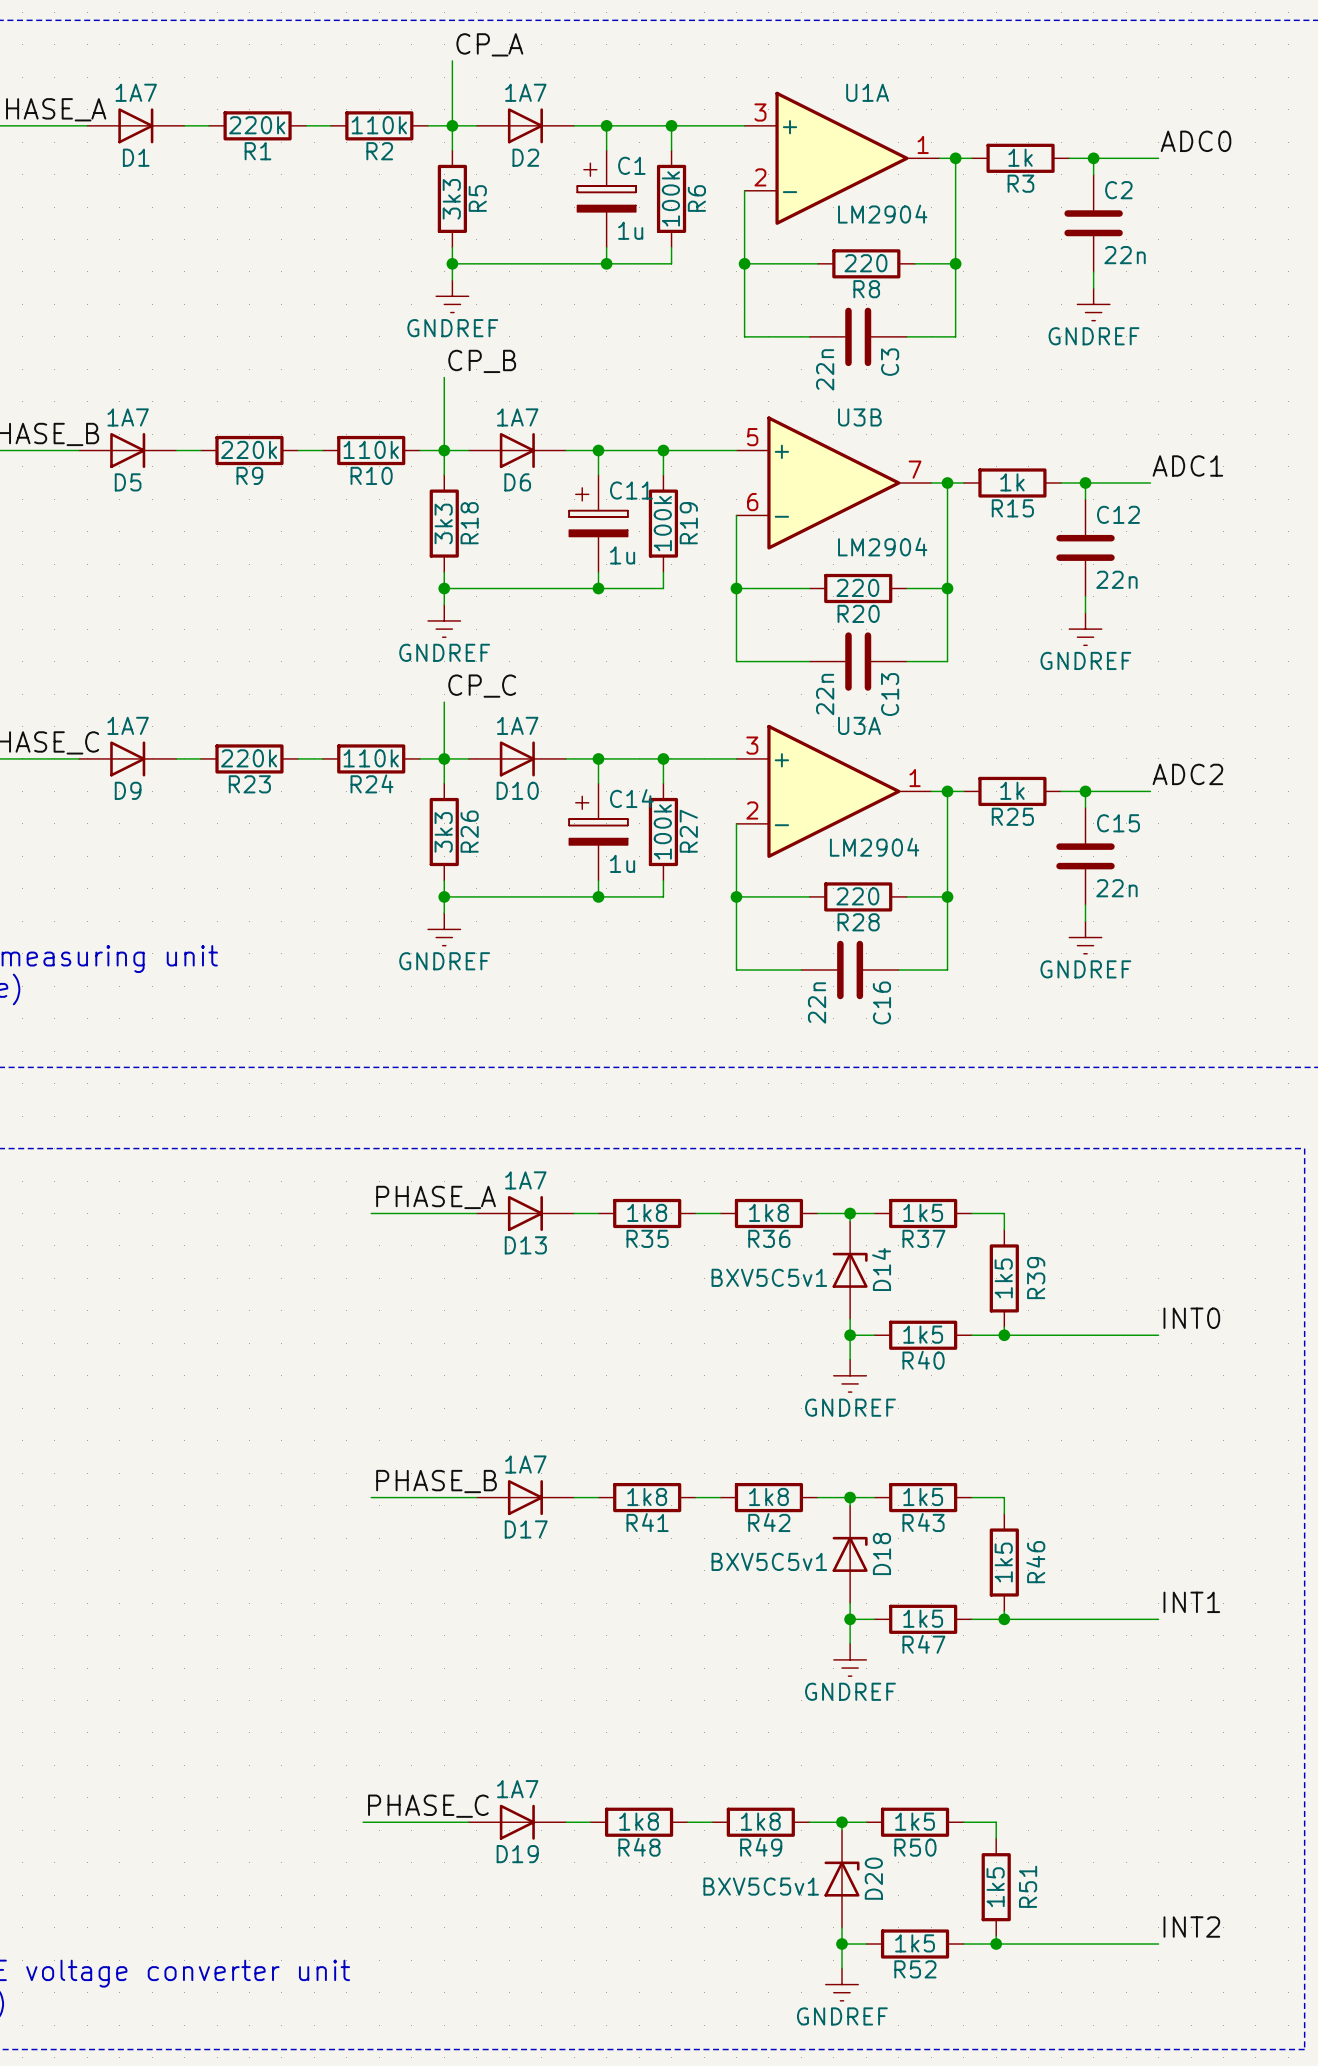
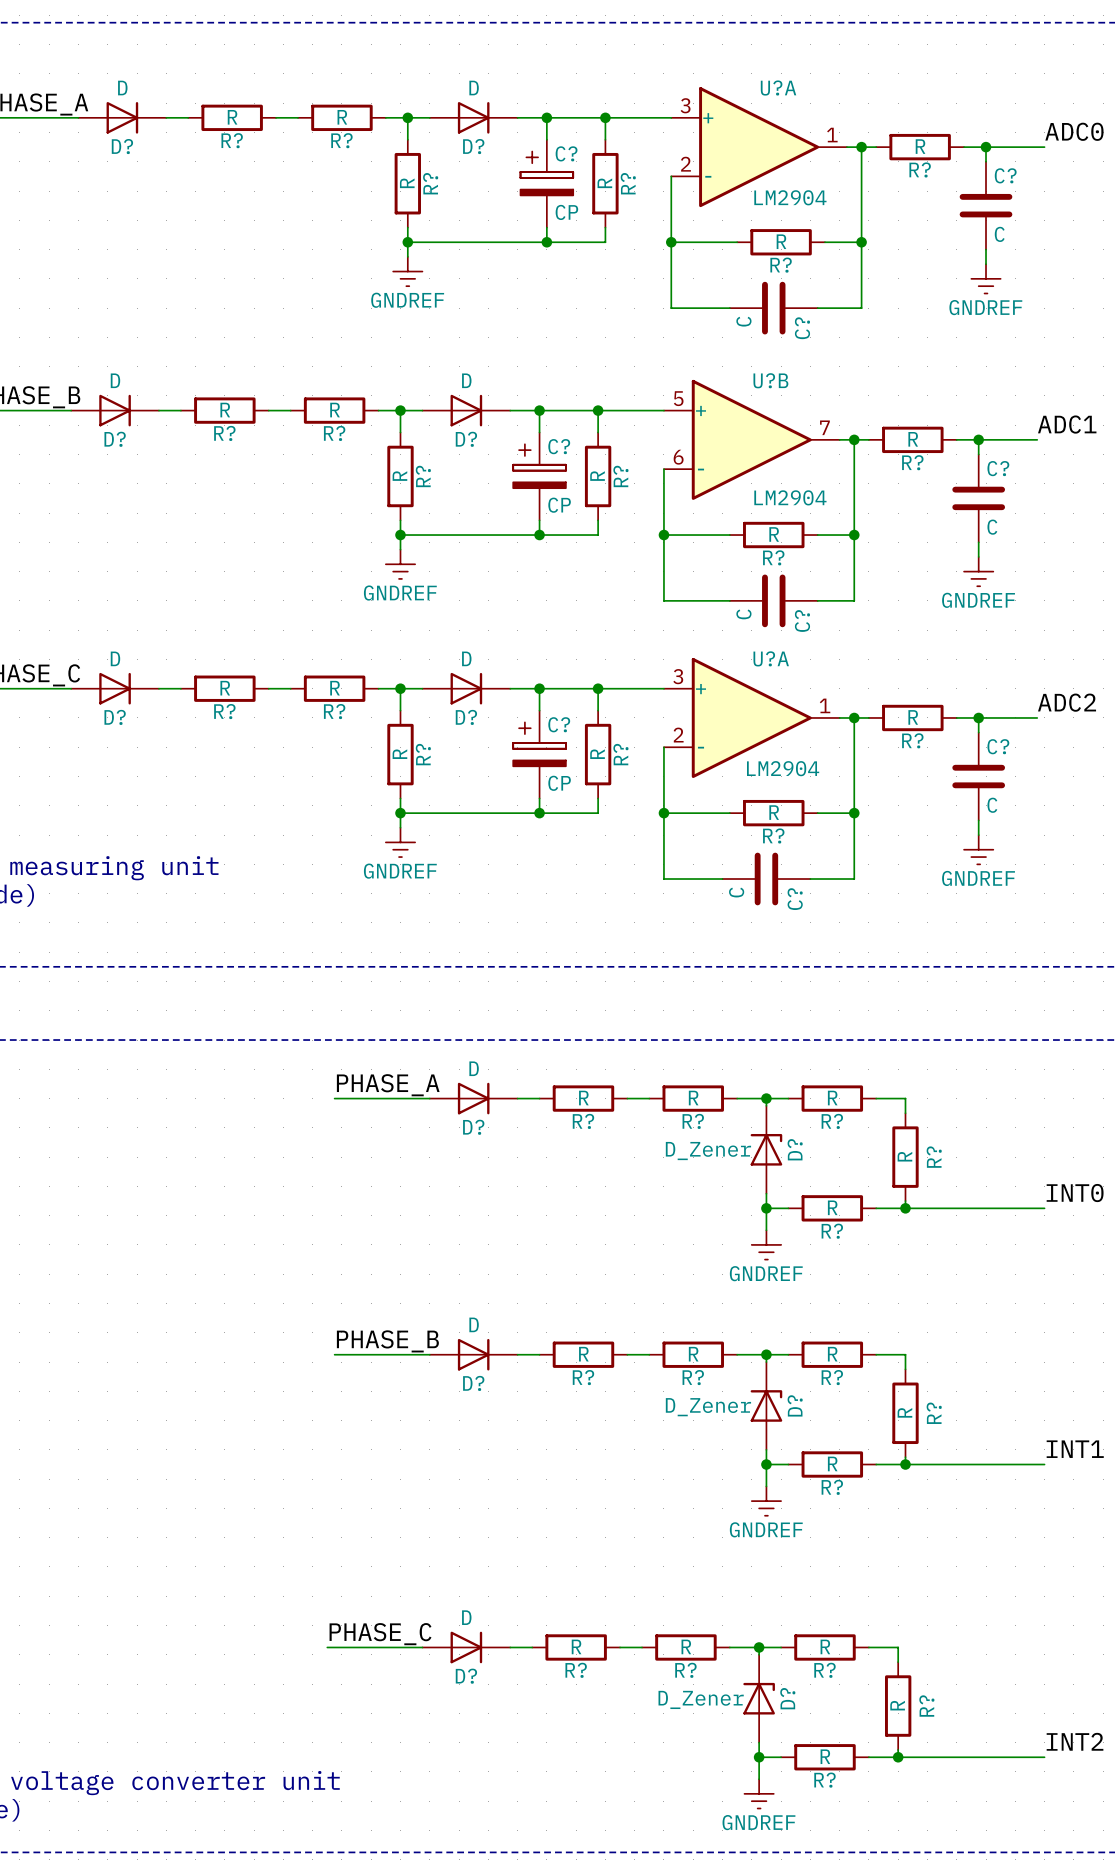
label: CP_A (489, 44) -> none
wire: (452, 60) (452, 125) -> none
D1 value: 1A7 (136, 92) -> D (122, 88)
D2 value: 1A7 (525, 92) -> D (474, 88)
U1A name: U1A (867, 92) -> U?A (778, 88)
R1 value: 220k (257, 125) -> R (232, 117)
R2 value: 110k (379, 125) -> R (342, 117)
R1 name: R1 (257, 151) -> R? (232, 140)
R2 name: R2 (379, 151) -> R? (341, 140)
D1 name: D1 (136, 157) -> D? (122, 146)
D2 name: D2 (525, 157) -> D? (473, 146)
R3 value: 1k (1020, 157) -> R (920, 146)
C1 name: C1 (631, 165) -> C? (566, 153)
R3 name: R3 (1020, 183) -> R? (920, 169)
C2 name: C2 (1118, 190) -> C? (1005, 175)
R5 name: R5 (477, 198) -> R? (430, 183)
R6 value: 100k (670, 198) -> R (604, 183)
R6 name: R6 (696, 198) -> R? (628, 183)
R5 value: 3k3 (451, 199) -> R (407, 183)
C1 value: 1u (630, 230) -> CP (566, 212)
C2 value: 22n (1125, 255) -> C (999, 234)
R8 value: 220 (865, 263) -> R (781, 241)
R8 name: R8 (866, 289) -> R? (781, 265)
label: CP_B (482, 361) -> none
C3 name: C3 (890, 362) -> C? (802, 328)
C3 value: 22n (825, 369) -> C (743, 321)
wire: (444, 377) (444, 450) -> none
D5 value: 1A7 (128, 417) -> D (115, 380)
D6 value: 1A7 (517, 417) -> D (466, 380)
U3B name: U3B (859, 417) -> U?B (770, 380)
R9 value: 220k (249, 449) -> R (225, 410)
R10 value: 110k (371, 449) -> R (335, 410)
R9 name: R9 (249, 475) -> R? (224, 433)
R10 name: R10 (371, 475) -> R? (334, 433)
D5 name: D5 (128, 482) -> D? (115, 439)
D6 name: D6 (517, 482) -> D? (466, 439)
R15 value: 1k (1012, 482) -> R (913, 439)
C11 name: C11 (631, 490) -> C? (559, 446)
R15 name: R15 (1012, 508) -> R? (912, 462)
C12 name: C12 (1118, 514) -> C? (998, 468)
R18 value: 3k3 (443, 523) -> R (399, 476)
R18 name: R18 (469, 523) -> R? (423, 476)
R19 value: 100k (662, 523) -> R (597, 476)
R19 name: R19 (688, 523) -> R? (620, 476)
C11 value: 1u (622, 555) -> CP (559, 505)
C12 value: 22n (1116, 579) -> C (992, 527)
R20 value: 220 (857, 587) -> R (774, 534)
R20 name: R20 (858, 613) -> R? (773, 557)
label: CP_C (482, 686) -> none
C13 value: 22n (825, 694) -> C (743, 614)
C13 name: C13 (890, 694) -> C? (802, 620)
wire: (444, 702) (444, 758) -> none
D9 value: 1A7 (128, 725) -> D (115, 658)
D10 value: 1A7 (517, 725) -> D (466, 658)
U3A name: U3A (859, 725) -> U?A (771, 658)
R23 value: 220k (249, 758) -> R (225, 688)
R24 value: 110k (371, 758) -> R (335, 688)
R24 name: R24 (371, 783) -> R? (334, 711)
R23 name: R23 (249, 784) -> R? (224, 711)
D9 name: D9 (128, 790) -> D? (115, 717)
D10 name: D10 (517, 790) -> D? (466, 717)
R25 value: 1k (1012, 790) -> R (913, 717)
C14 name: C14 (631, 798) -> C? (559, 724)
R25 name: R25 (1012, 816) -> R? (912, 740)
C15 name: C15 (1118, 823) -> C? (998, 746)
R26 name: R26 (469, 831) -> R? (423, 754)
R27 name: R27 (688, 831) -> R? (620, 754)
R26 value: 3k3 (443, 832) -> R (399, 754)
R27 value: 100k (662, 832) -> R (597, 754)
C14 value: 1u (622, 863) -> CP (559, 783)
C15 value: 22n (1116, 888) -> C (992, 805)
R28 value: 220 (857, 896) -> R (774, 812)
R28 name: R28 (858, 922) -> R? (773, 835)
C16 value: 22n (817, 1002) -> C (736, 892)
C16 name: C16 (881, 1002) -> C? (795, 899)
D13 value: 1A7 (525, 1180) -> D (474, 1068)
R35 value: 1k8 (647, 1212) -> R (583, 1098)
R36 value: 1k8 (768, 1212) -> R (693, 1098)
R37 value: 1k5 (923, 1212) -> R (832, 1098)
R35 name: R35 (647, 1238) -> R? (583, 1121)
R36 name: R36 (769, 1238) -> R? (693, 1121)
R37 name: R37 (923, 1238) -> R? (832, 1121)
D13 name: D13 (525, 1245) -> D? (473, 1127)
D14 name: D14 (881, 1269) -> D? (795, 1149)
D14 value: BXV5C5v1 (769, 1277) -> D_Zener (708, 1151)
R39 value: 1k5 (1003, 1278) -> R (904, 1156)
R39 name: R39 (1036, 1278) -> R? (934, 1157)
R40 value: 1k5 (923, 1334) -> R (832, 1207)
R40 name: R40 (923, 1360) -> R? (832, 1231)
D17 value: 1A7 (525, 1464) -> D (474, 1324)
R41 value: 1k8 (647, 1496) -> R (583, 1354)
R42 value: 1k8 (768, 1496) -> R (693, 1354)
R43 value: 1k5 (923, 1496) -> R (832, 1354)
R41 name: R41 (647, 1522) -> R? (583, 1377)
R42 name: R42 (769, 1522) -> R? (693, 1377)
R43 name: R43 (923, 1522) -> R? (832, 1377)
D17 name: D17 (526, 1529) -> D? (473, 1383)
D18 name: D18 (881, 1554) -> D? (795, 1405)
D18 value: BXV5C5v1 (769, 1561) -> D_Zener (708, 1407)
R46 value: 1k5 (1003, 1562) -> R (904, 1412)
R46 name: R46 (1035, 1562) -> R? (934, 1413)
R47 value: 1k5 (923, 1618) -> R (832, 1463)
R47 name: R47 (923, 1644) -> R? (832, 1487)
D19 value: 1A7 (517, 1789) -> D (466, 1617)
R48 value: 1k8 (639, 1821) -> R (576, 1646)
R49 value: 1k8 (760, 1821) -> R (686, 1646)
R50 value: 1k5 (915, 1821) -> R (825, 1646)
R48 name: R48 (639, 1847) -> R? (576, 1670)
R49 name: R49 (761, 1847) -> R? (685, 1670)
R50 name: R50 (915, 1847) -> R? (824, 1670)
D19 name: D19 (517, 1854) -> D? (466, 1676)
D20 name: D20 (873, 1878) -> D? (787, 1698)
D20 value: BXV5C5v1 (761, 1886) -> D_Zener (701, 1699)
R51 name: R51 (1028, 1886) -> R? (926, 1706)
R51 value: 1k5 (995, 1887) -> R (897, 1705)
R52 value: 1k5 (915, 1943) -> R (825, 1756)
R52 name: R52 (915, 1969) -> R? (824, 1780)

